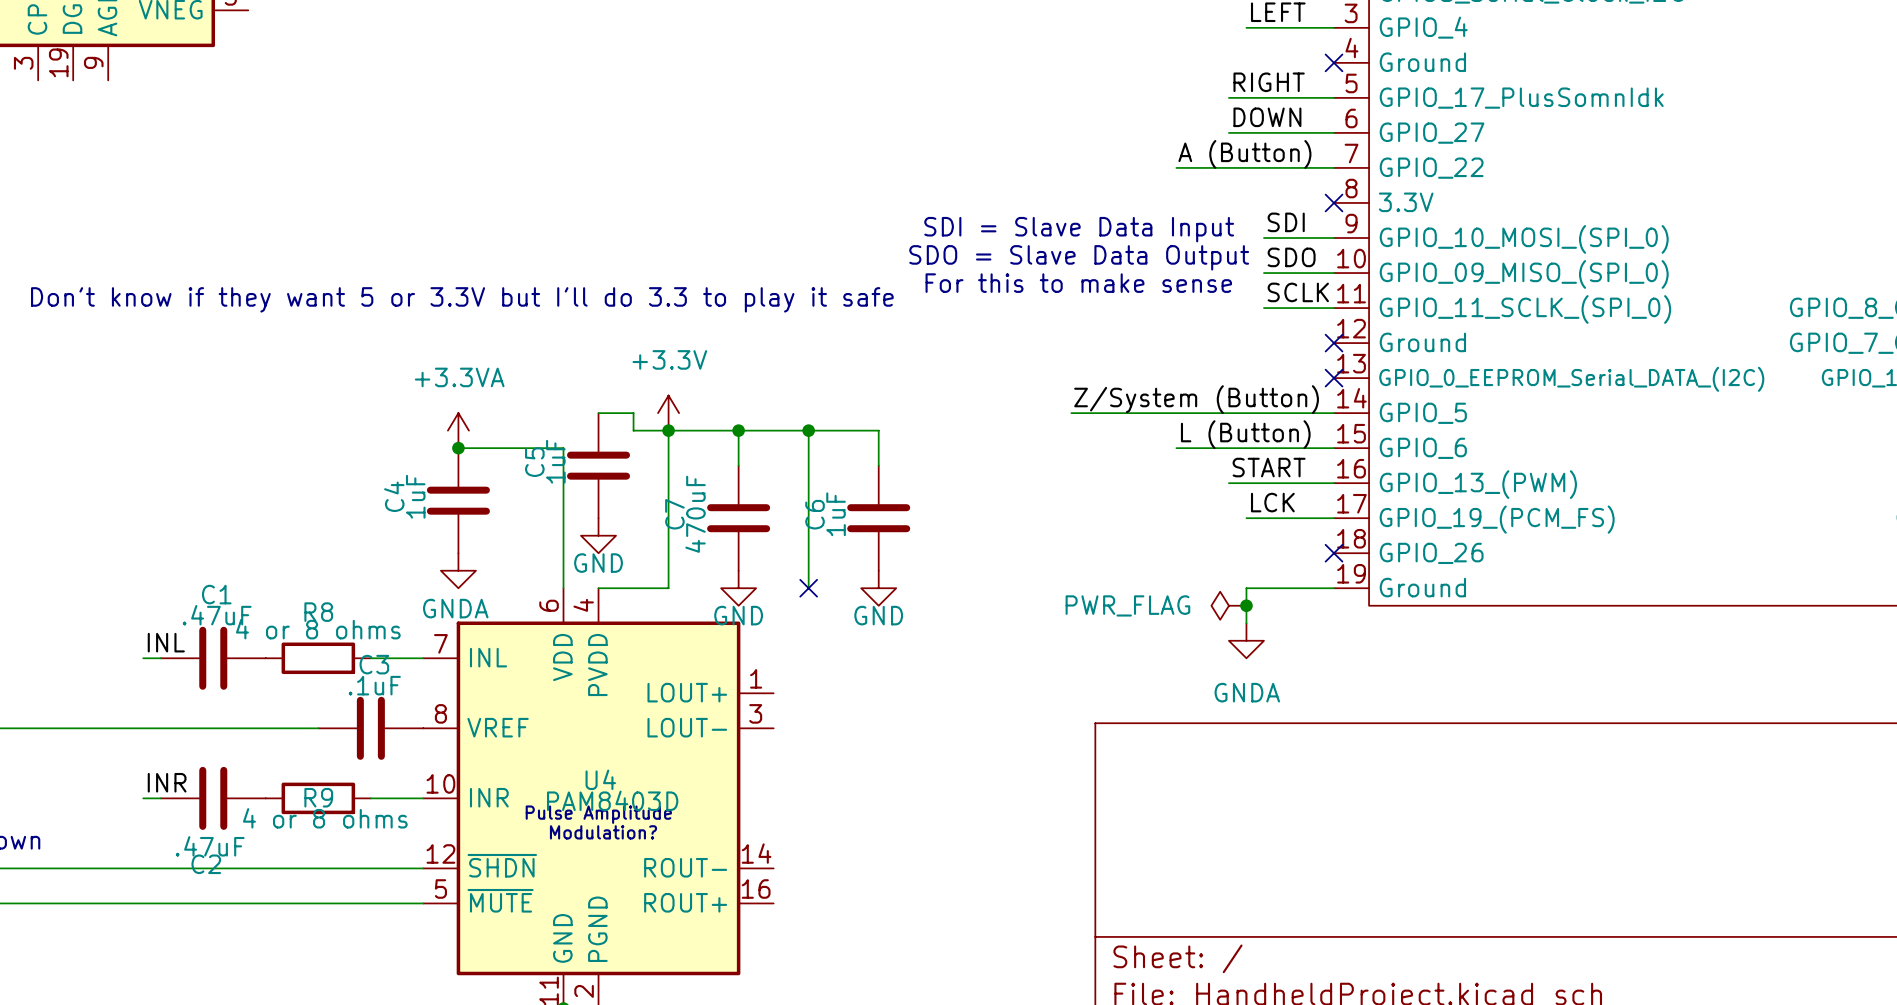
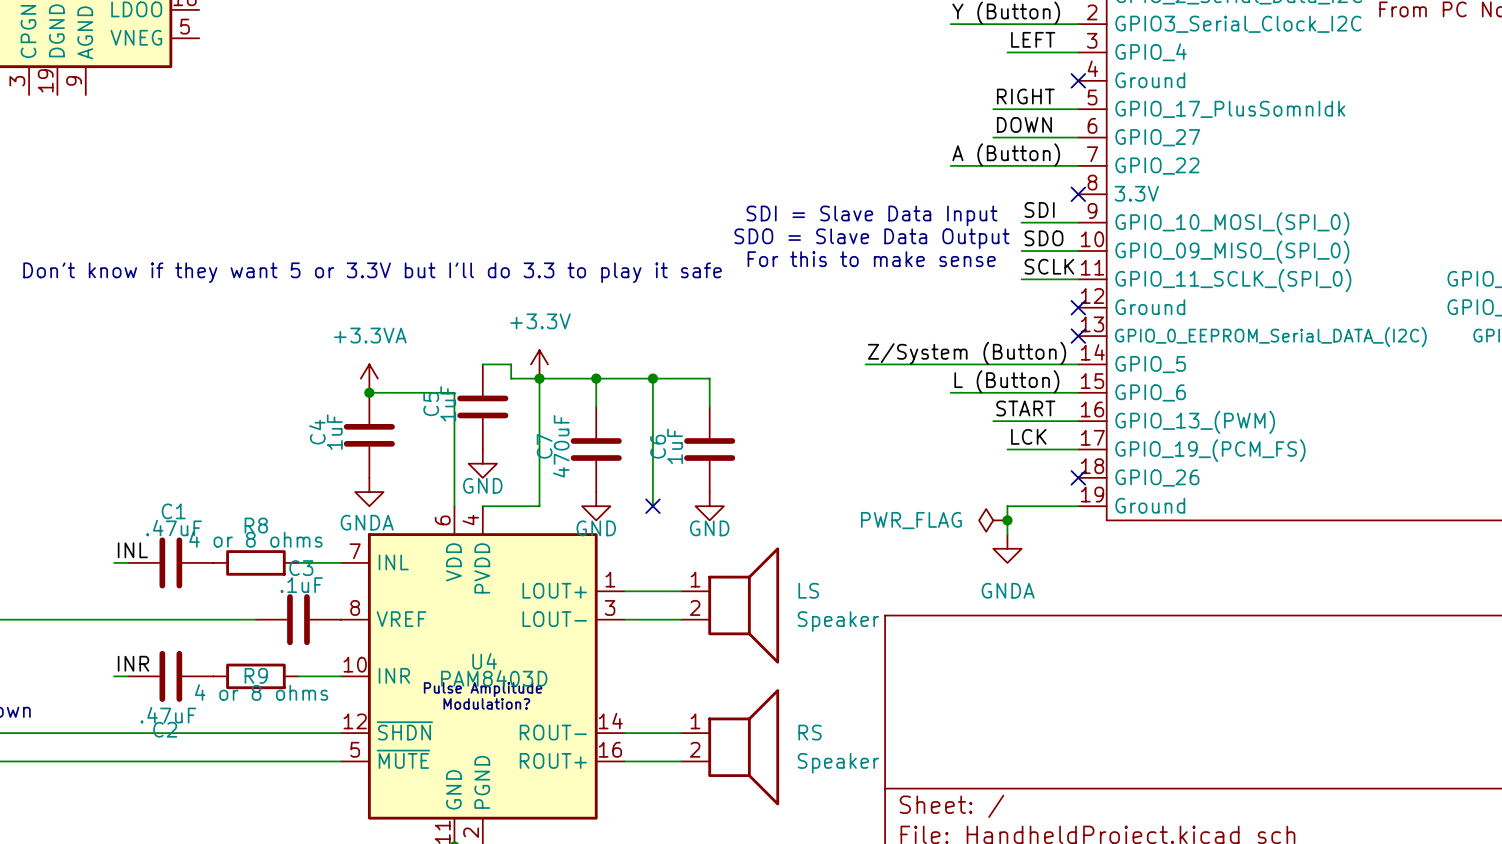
wire: none -> (624, 591) (681, 591)
LS: none -> Speaker (730, 605)
wire: none -> (624, 619) (681, 619)
wire: none -> (624, 733) (681, 733)
RS: none -> Speaker (730, 747)
wire: none -> (624, 761) (681, 761)

